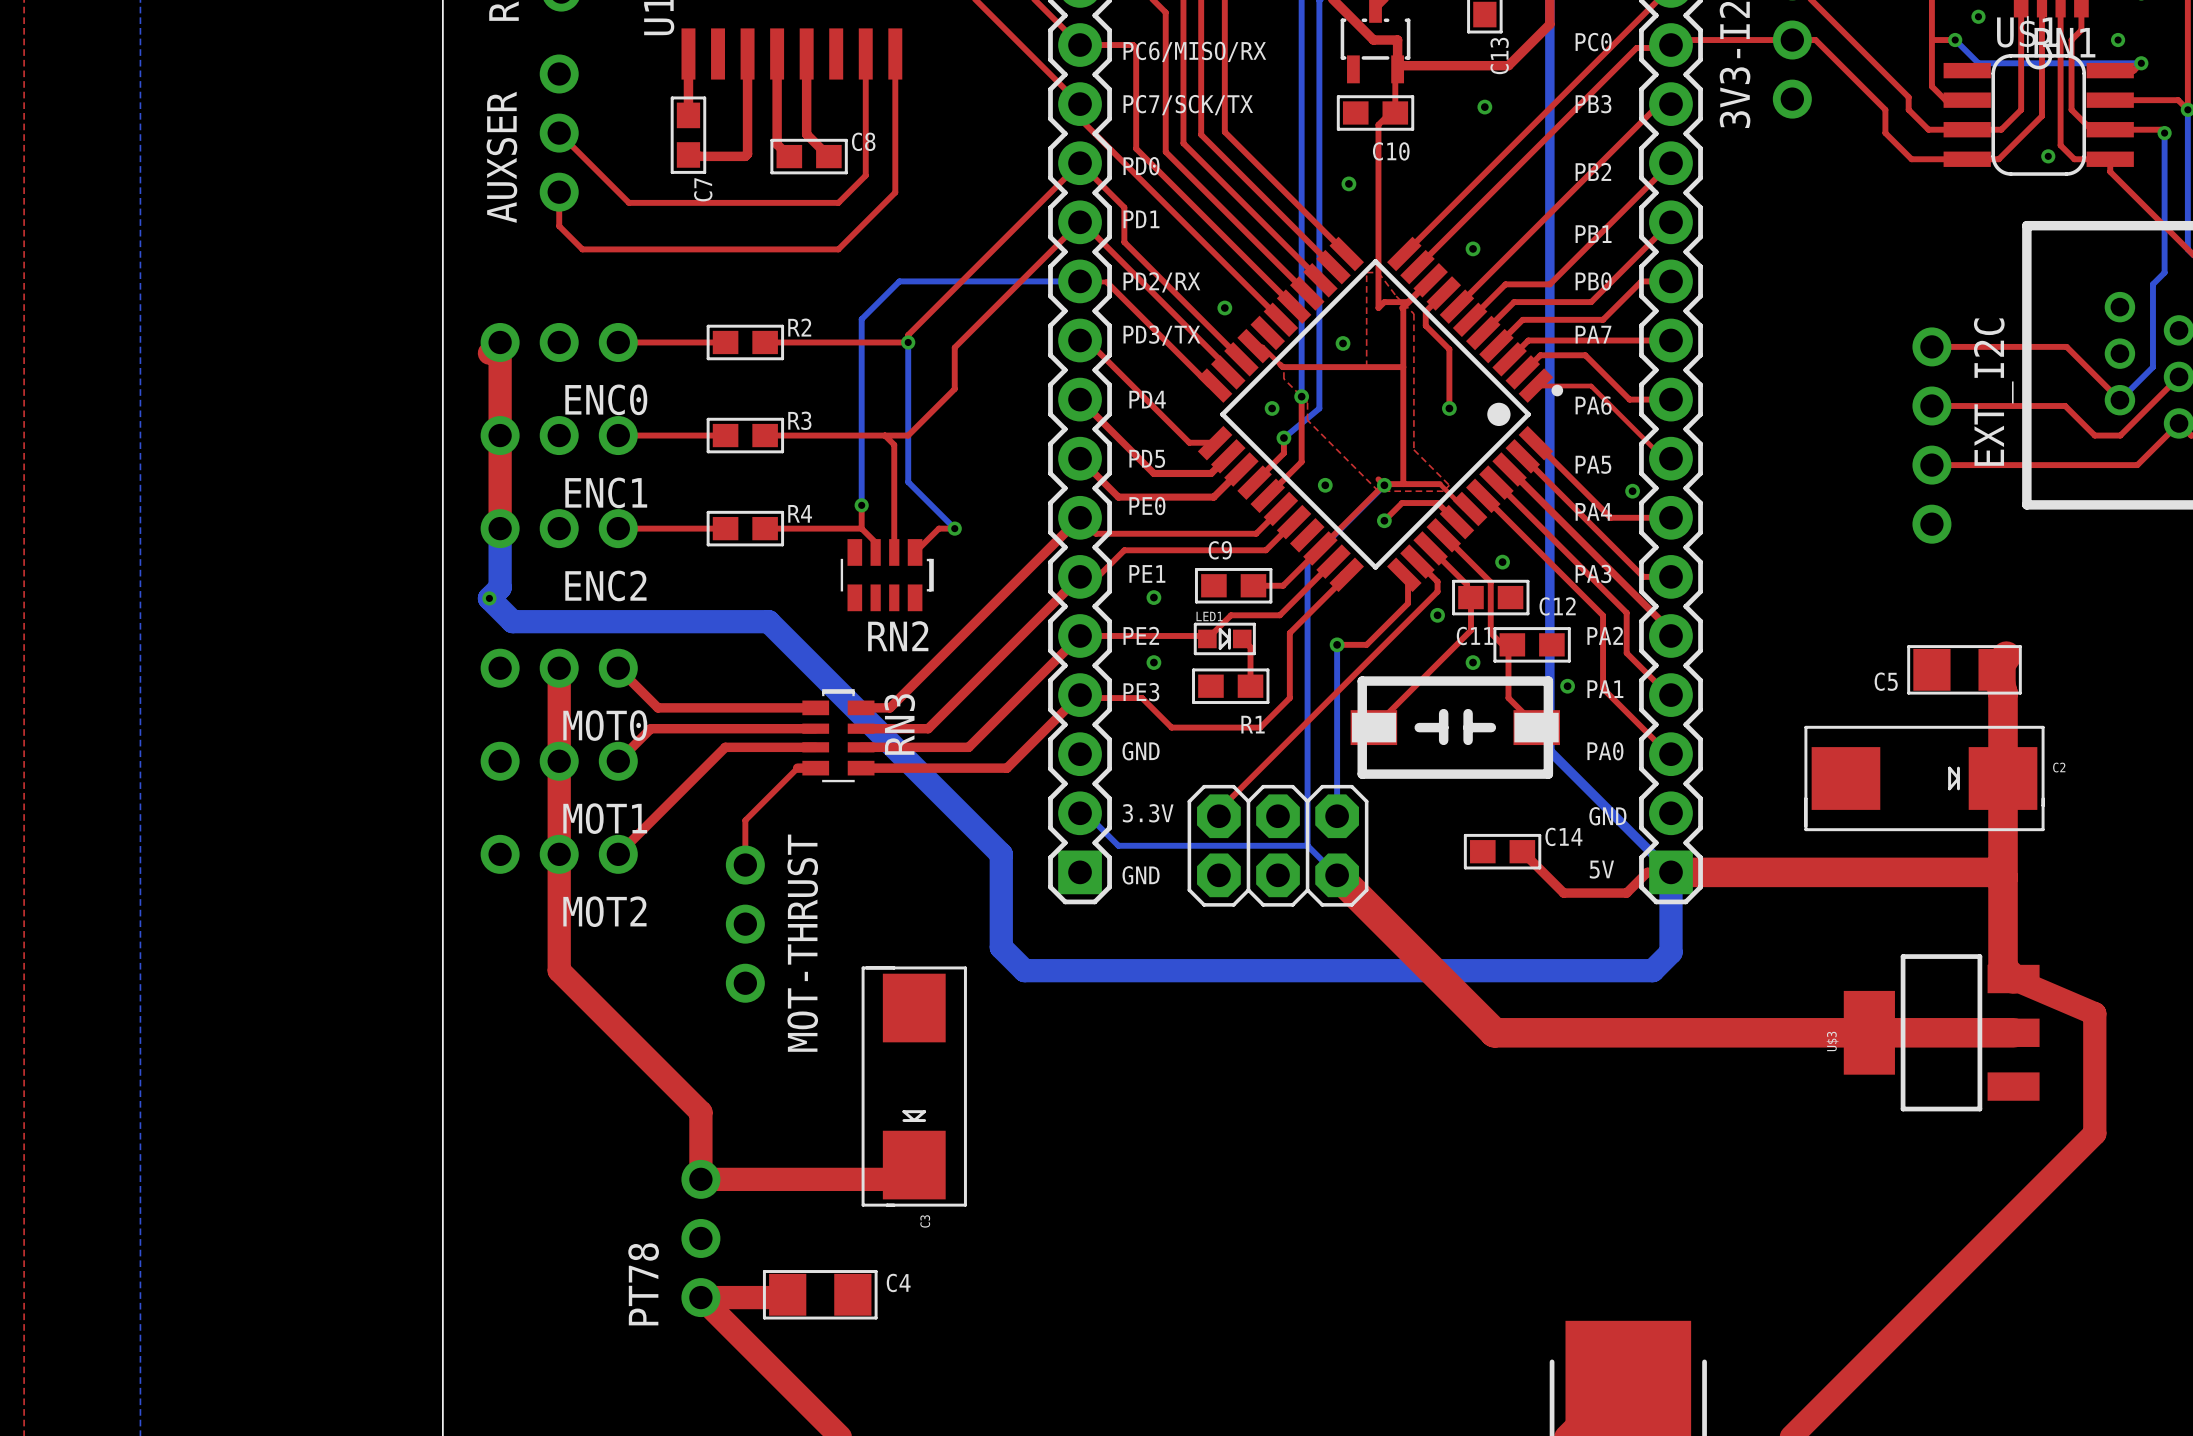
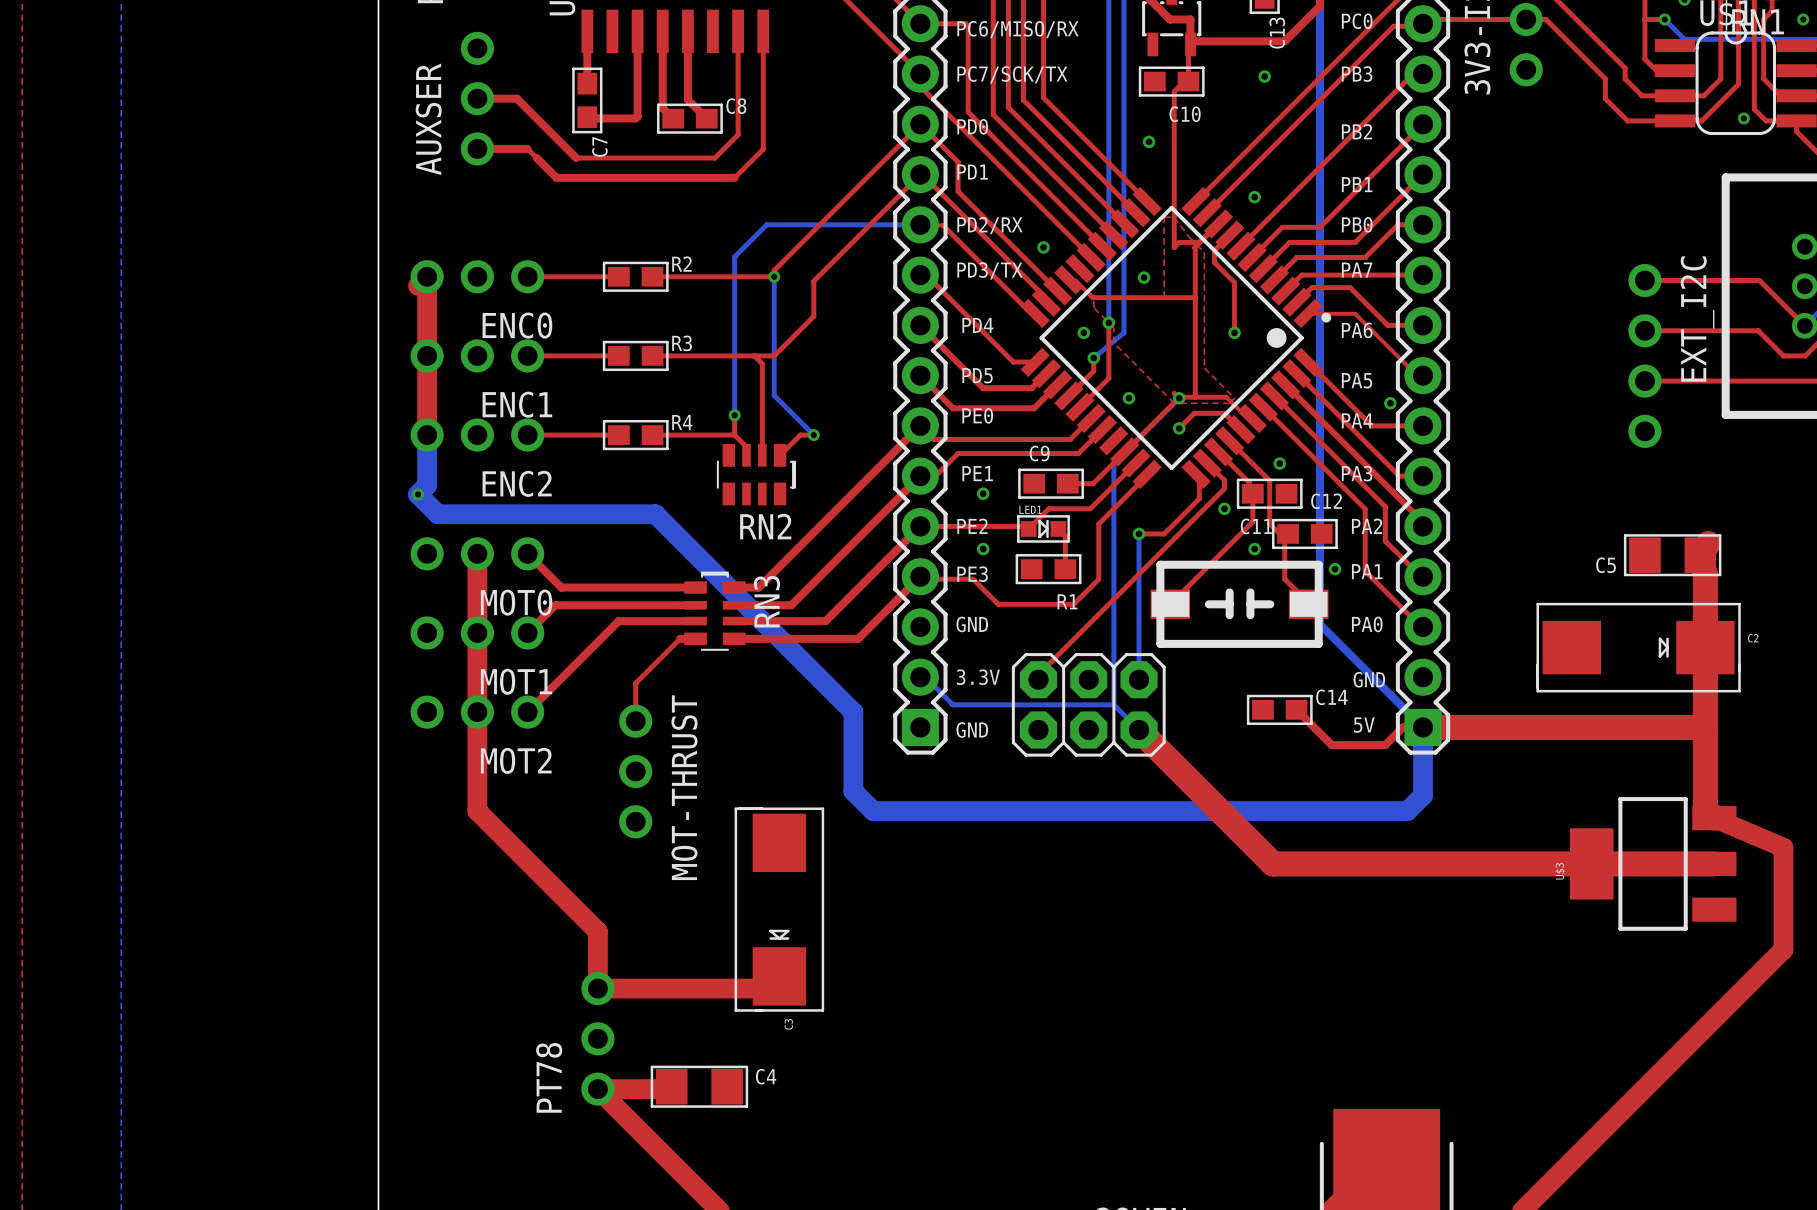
top track: (559, 133) (618, 192) -> (477, 98) (516, 98) (576, 158)
top track: (559, 192) (559, 226) (582, 249) (838, 249) (861, 226) -> (536, 158) (556, 177) (734, 177)
top track: none -> (477, 148) (527, 148)
top track: (629, 202) (675, 202) -> none

